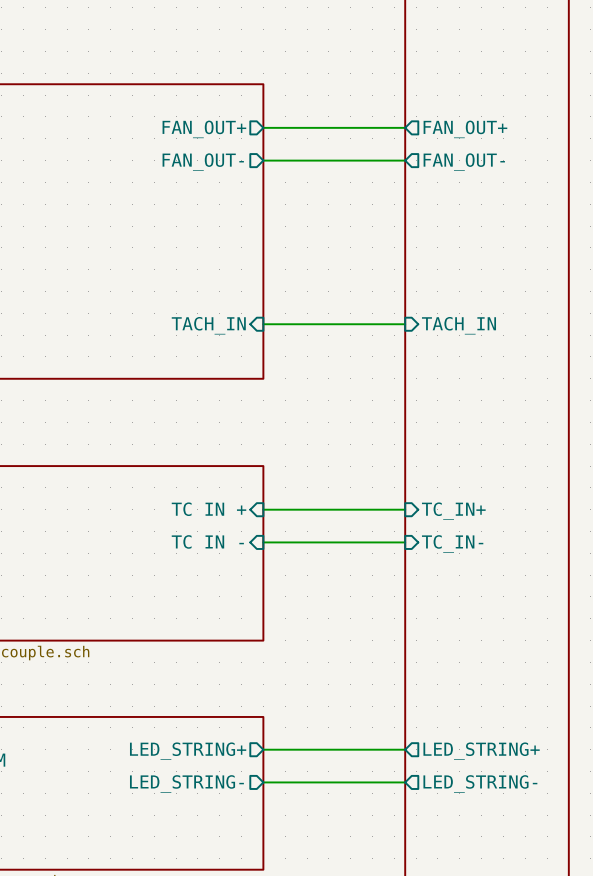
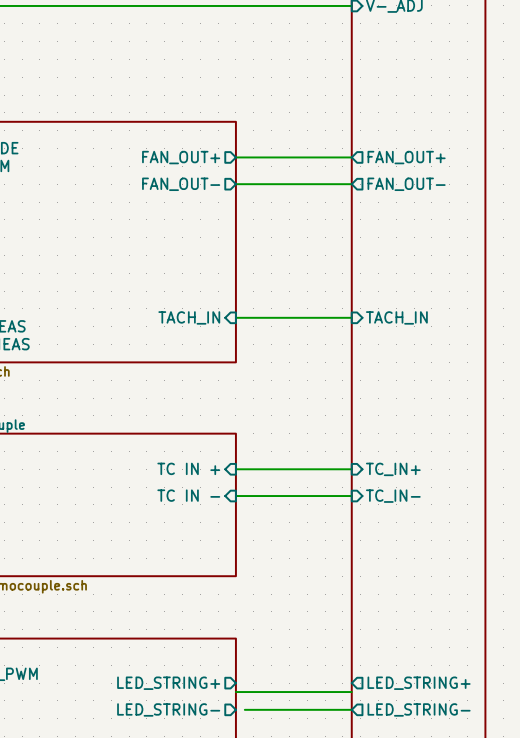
wire: (263, 749) (405, 749) -> none
sheet pin position: LED_STRING+ (188, 751) -> LED_STRING+ (168, 683)
sheet pin position: LED_STRING+ (481, 751) -> LED_STRING+ (419, 683)
sheet pin position: LED_STRING- (186, 783) -> LED_STRING- (168, 709)
sheet pin position: LED_STRING- (480, 783) -> LED_STRING- (419, 709)
wire: none -> (244, 709) (351, 709)

